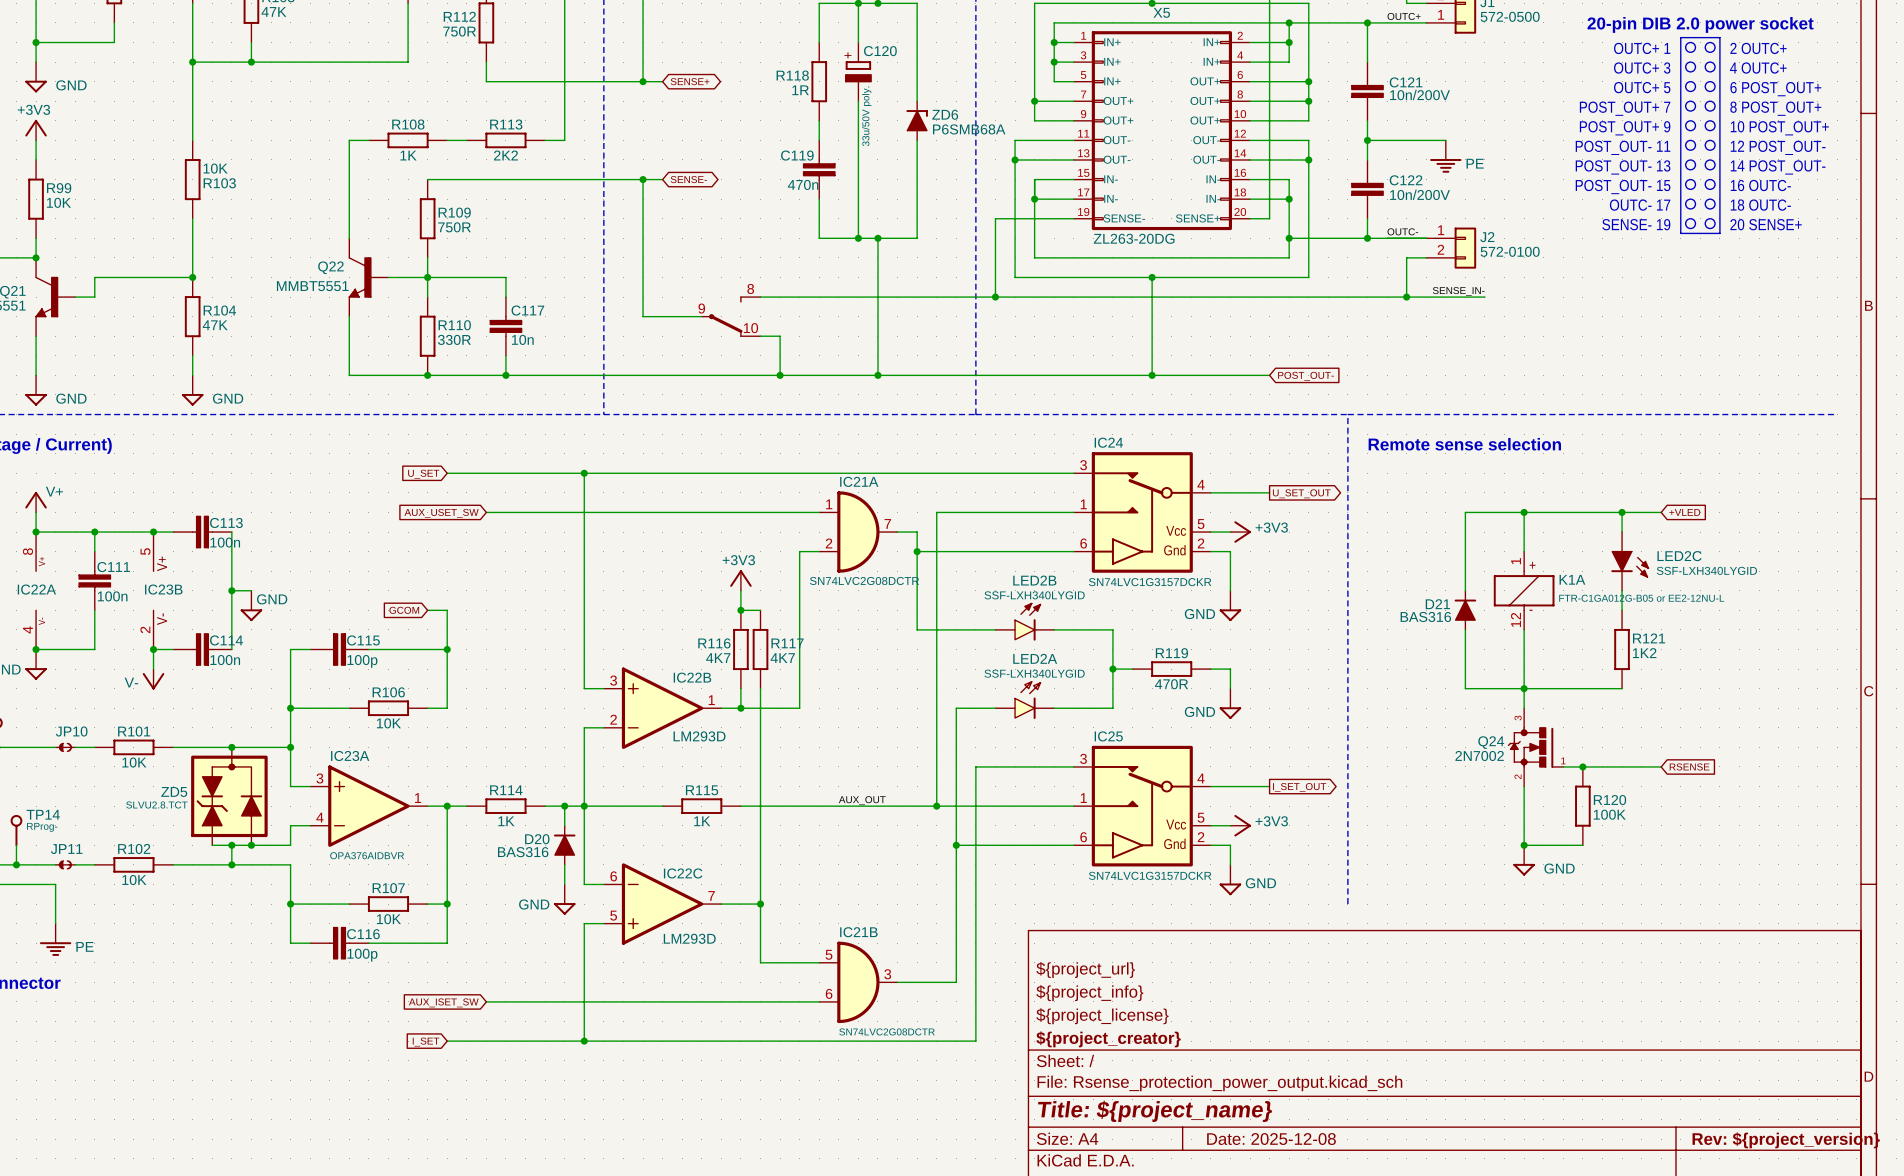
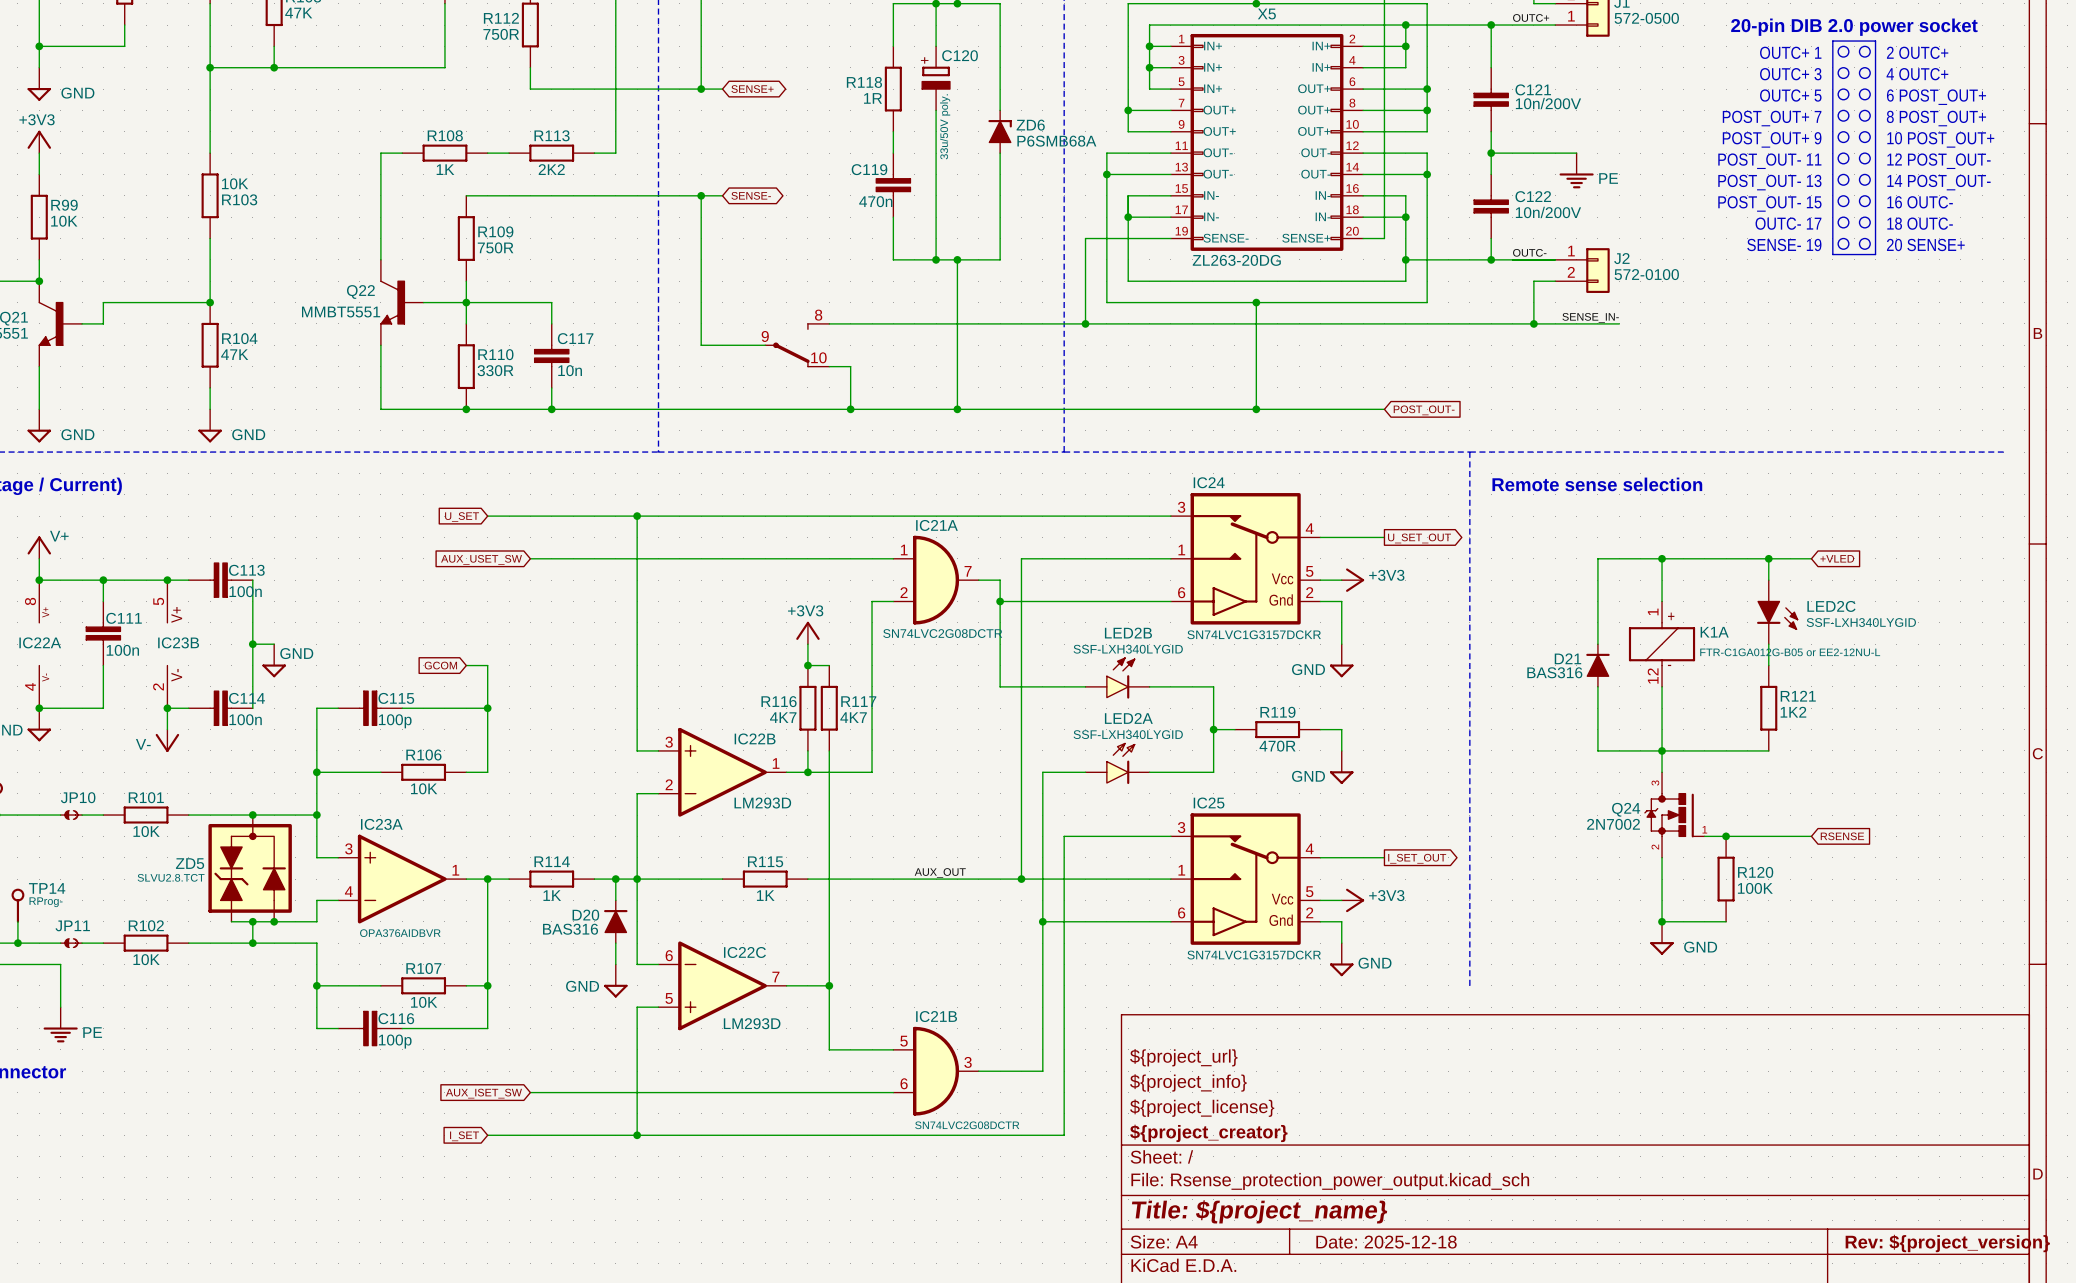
title block: Date: 2025-12-08 (1271, 1139) -> Date: 2025-12-18 (1386, 1242)

